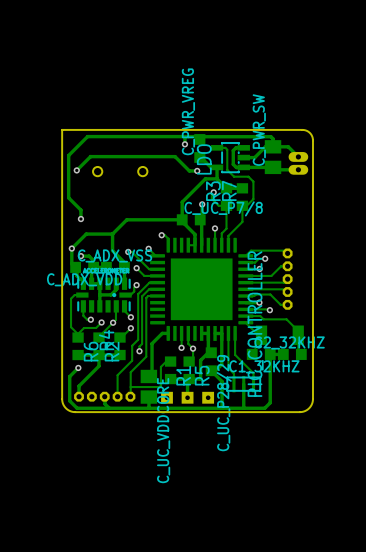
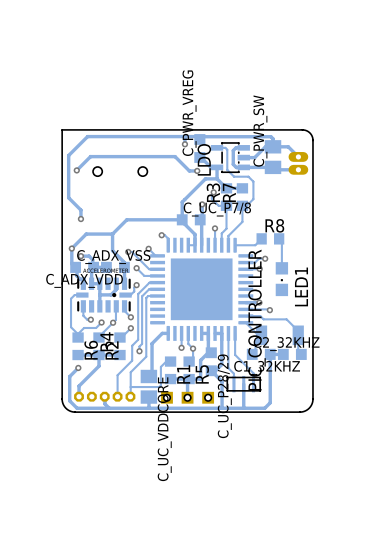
track: none -> (261, 238) (255, 245) (235, 245)
R8: none -> (270, 238)
track: none -> (279, 238) (281, 241) (281, 268)
track: (287, 253) (284, 250) (251, 250) (245, 255) -> none
track: (287, 266) (281, 266) (271, 275) (245, 275) -> none
LED1: none -> (281, 279)
track: (287, 279) (284, 282) (245, 282) -> none
part: (287, 279) -> none
track: (245, 289) (284, 289) (287, 291) -> none
track: (245, 296) (270, 294) (280, 304) (287, 304) -> none

